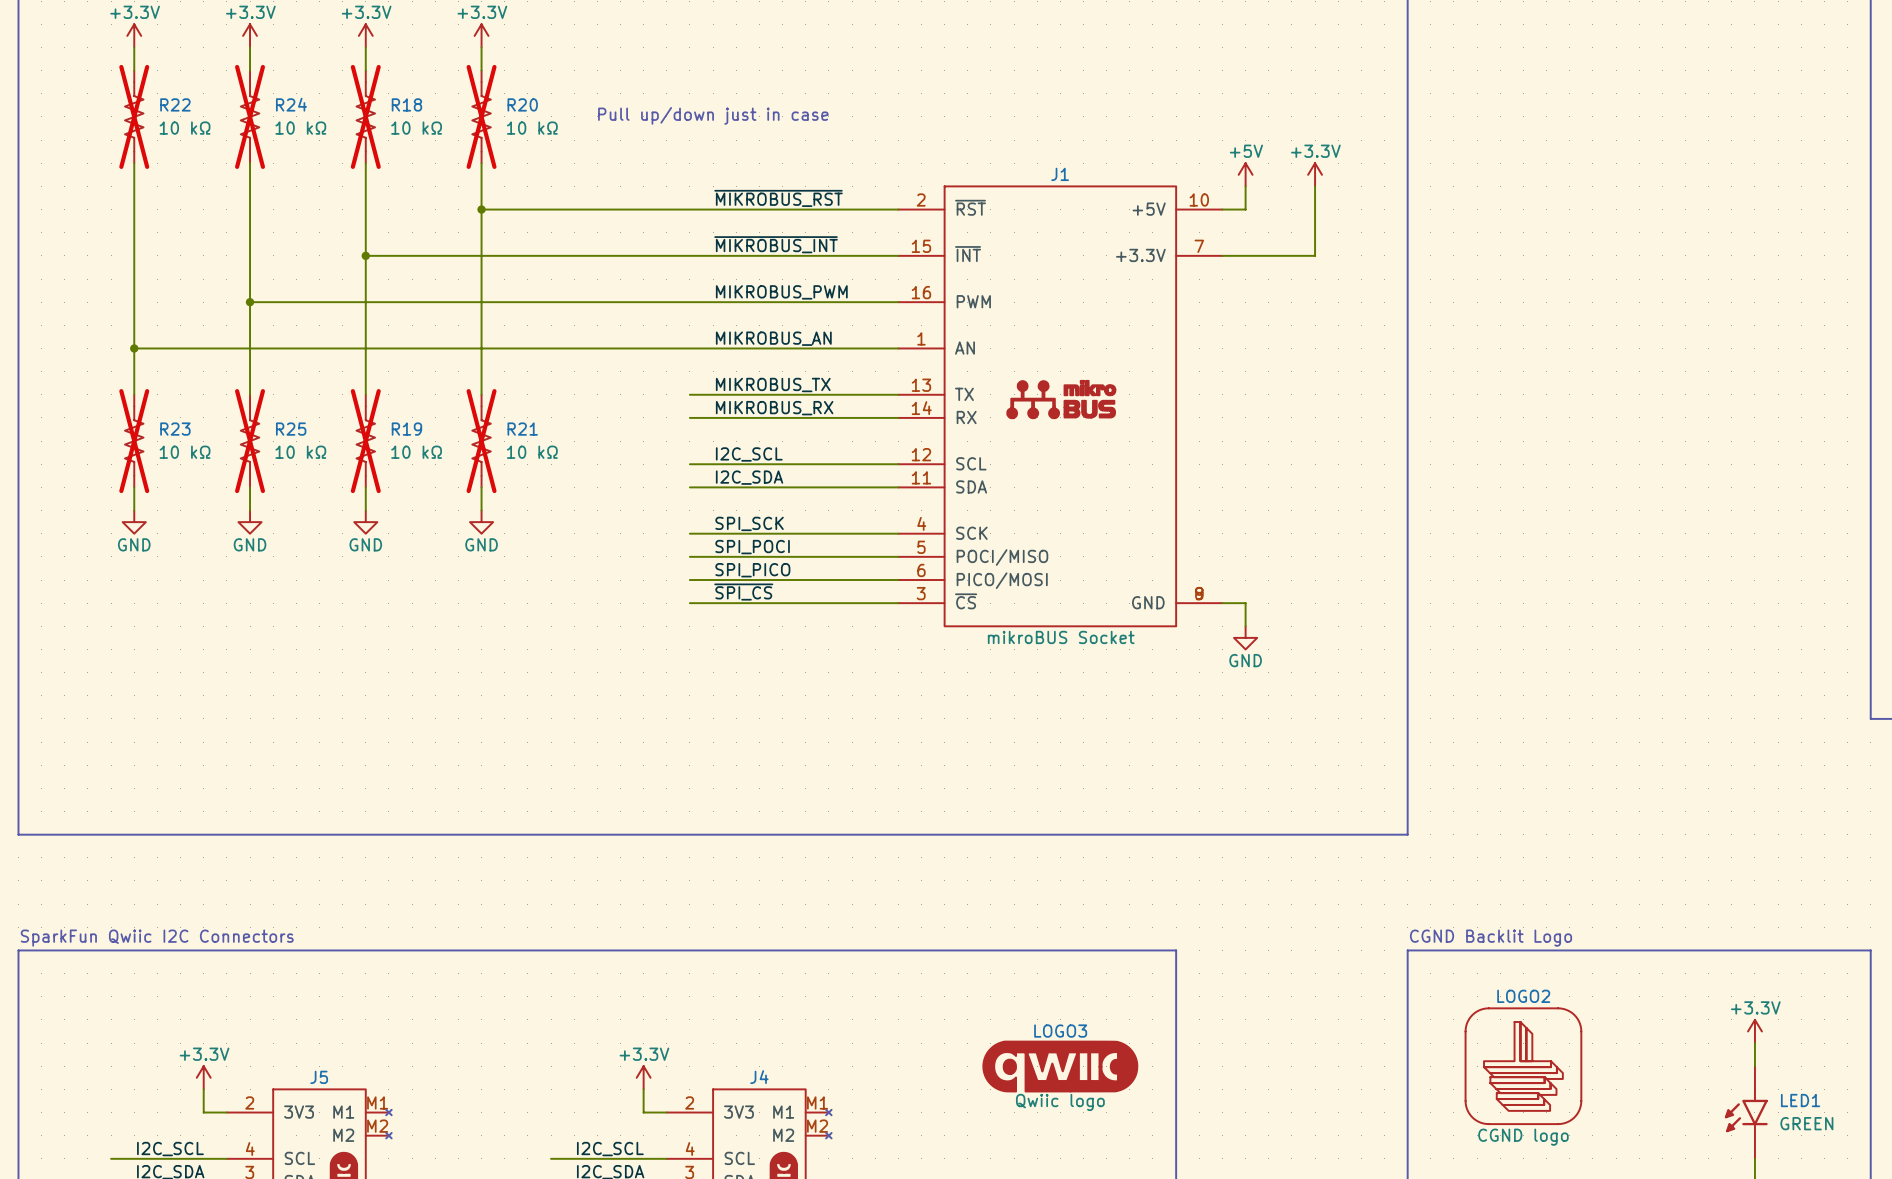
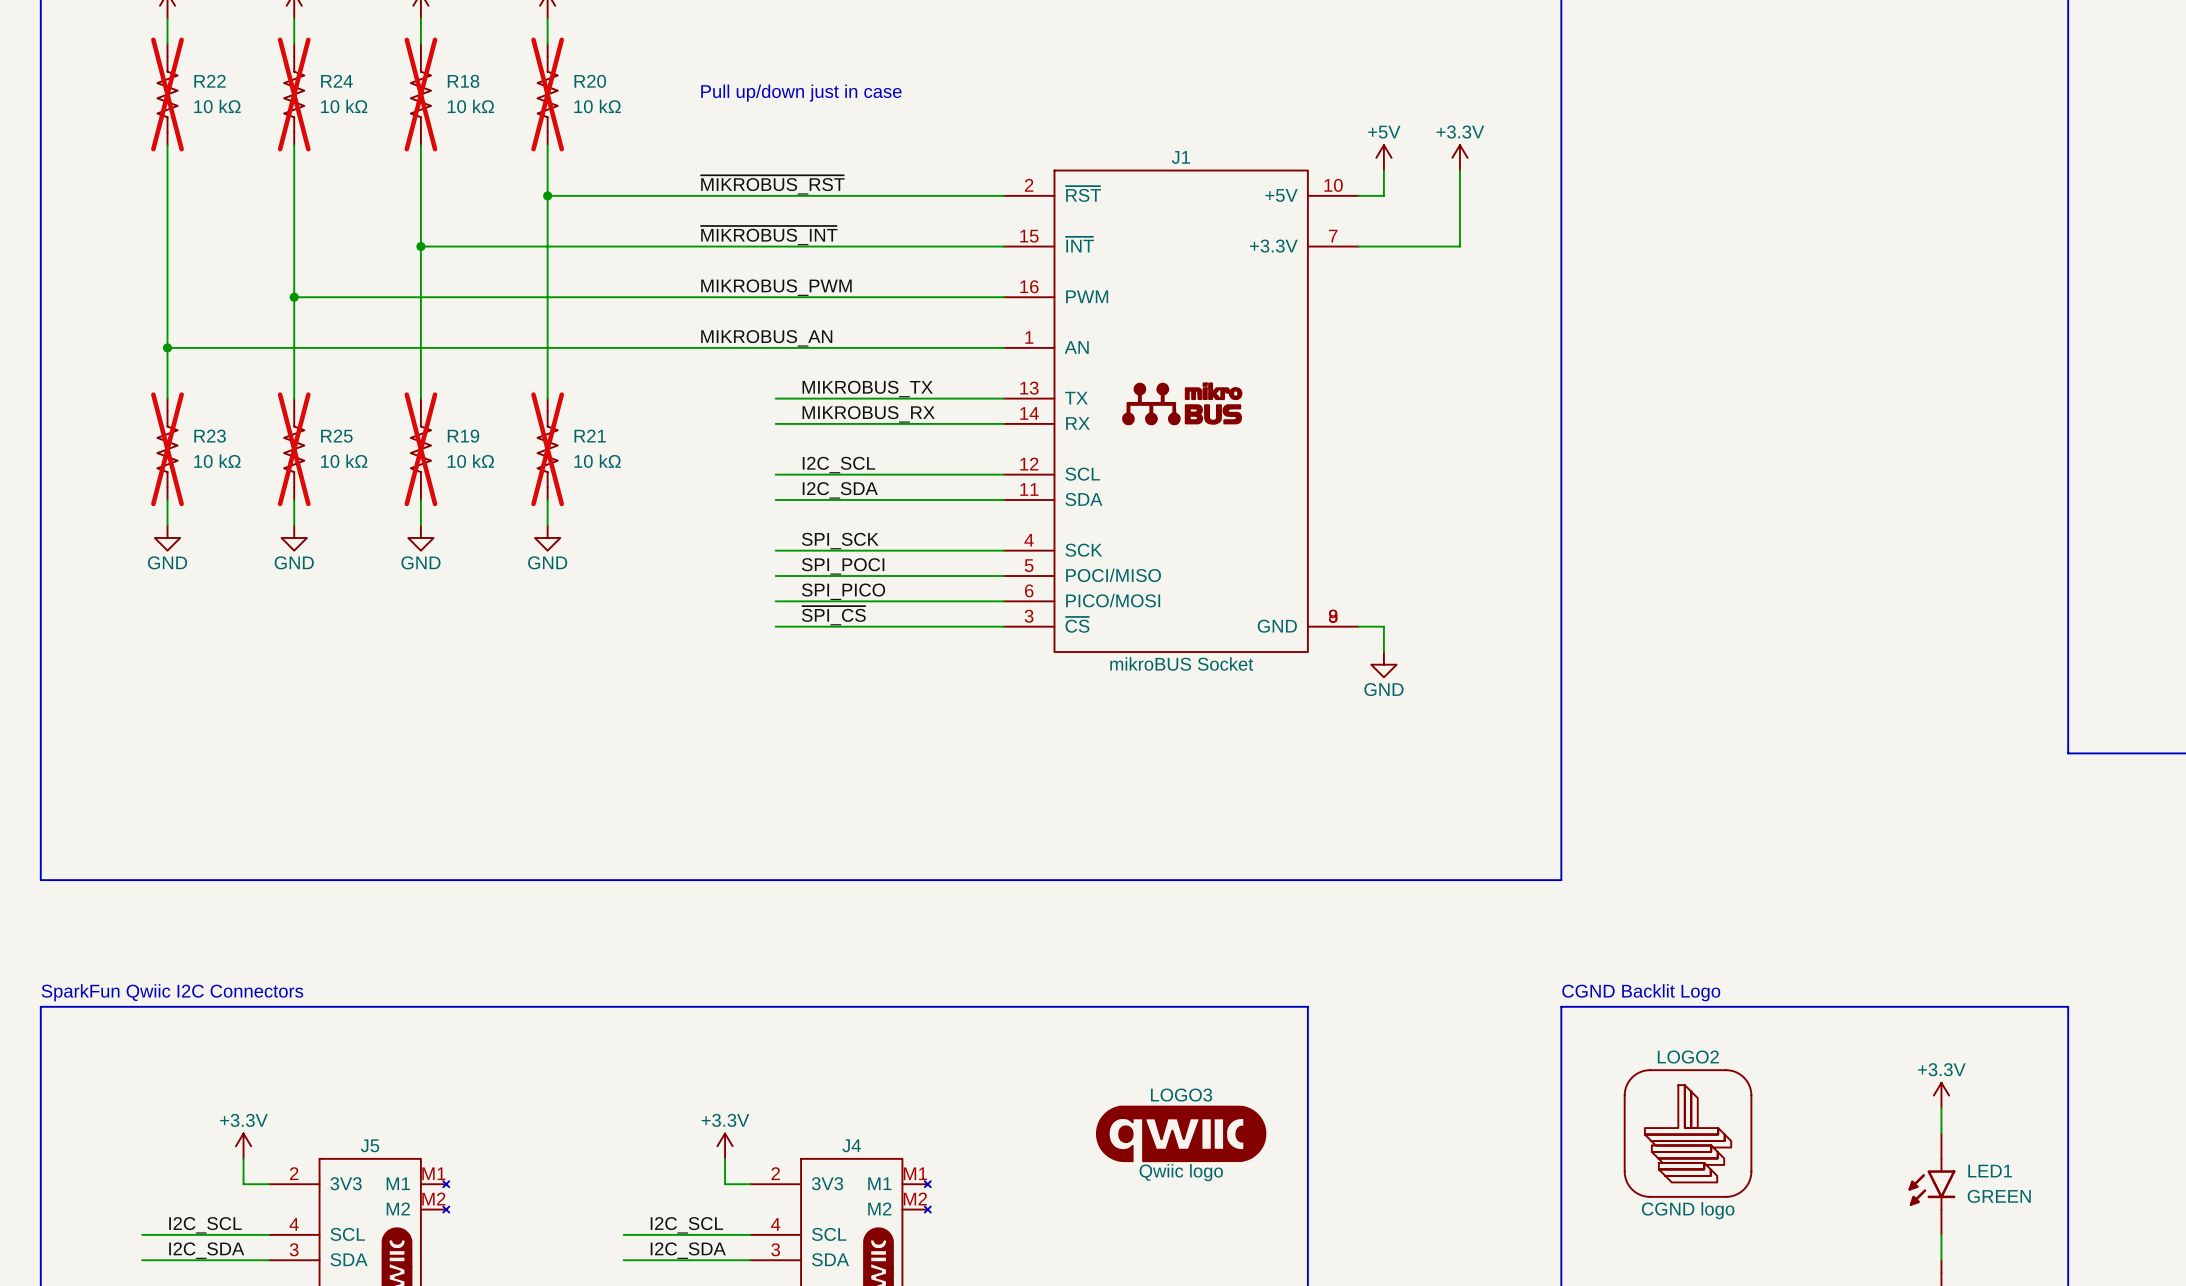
label position: ~{MIKROBUS_RST} (778, 198) -> ~{MIKROBUS_RST} (772, 184)
label position: ~{MIKROBUS_INT} (776, 244) -> ~{MIKROBUS_INT} (769, 235)
label position: MIKROBUS_PWM (781, 292) -> MIKROBUS_PWM (776, 287)
label position: MIKROBUS_AN (773, 338) -> MIKROBUS_AN (766, 338)

